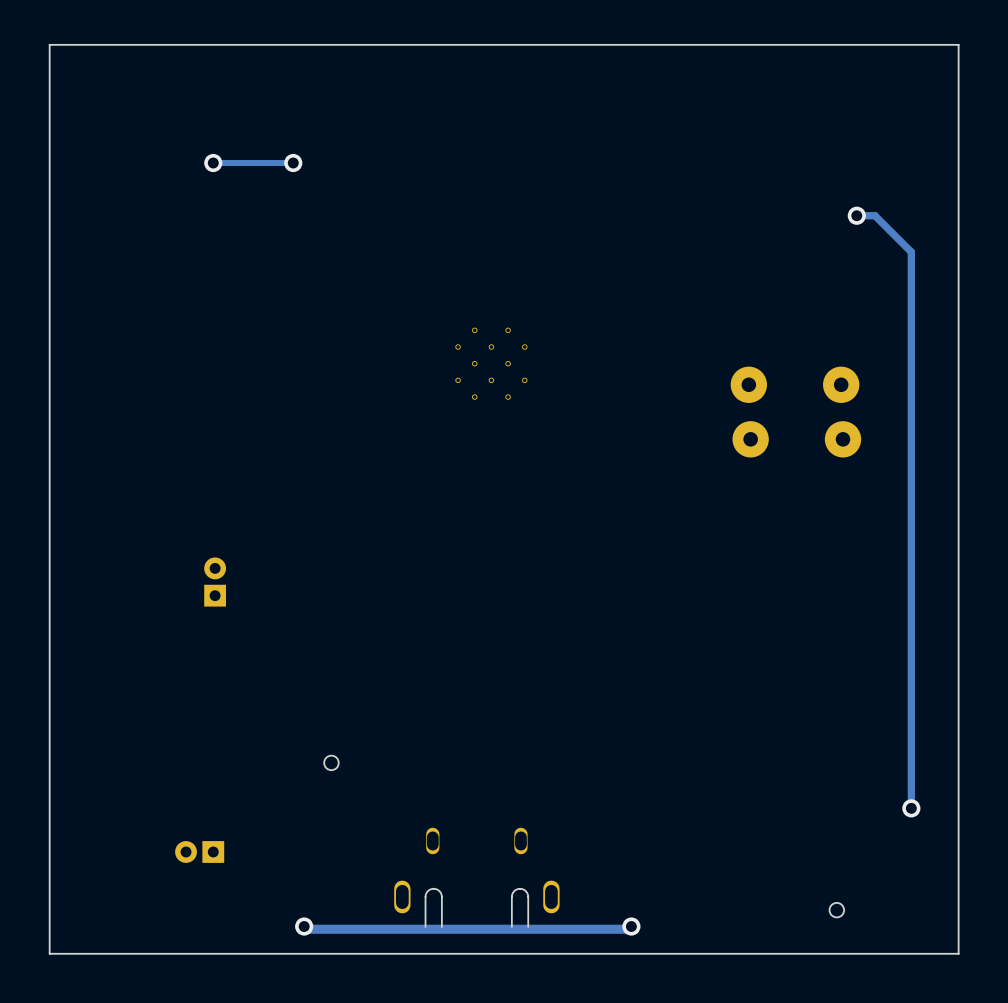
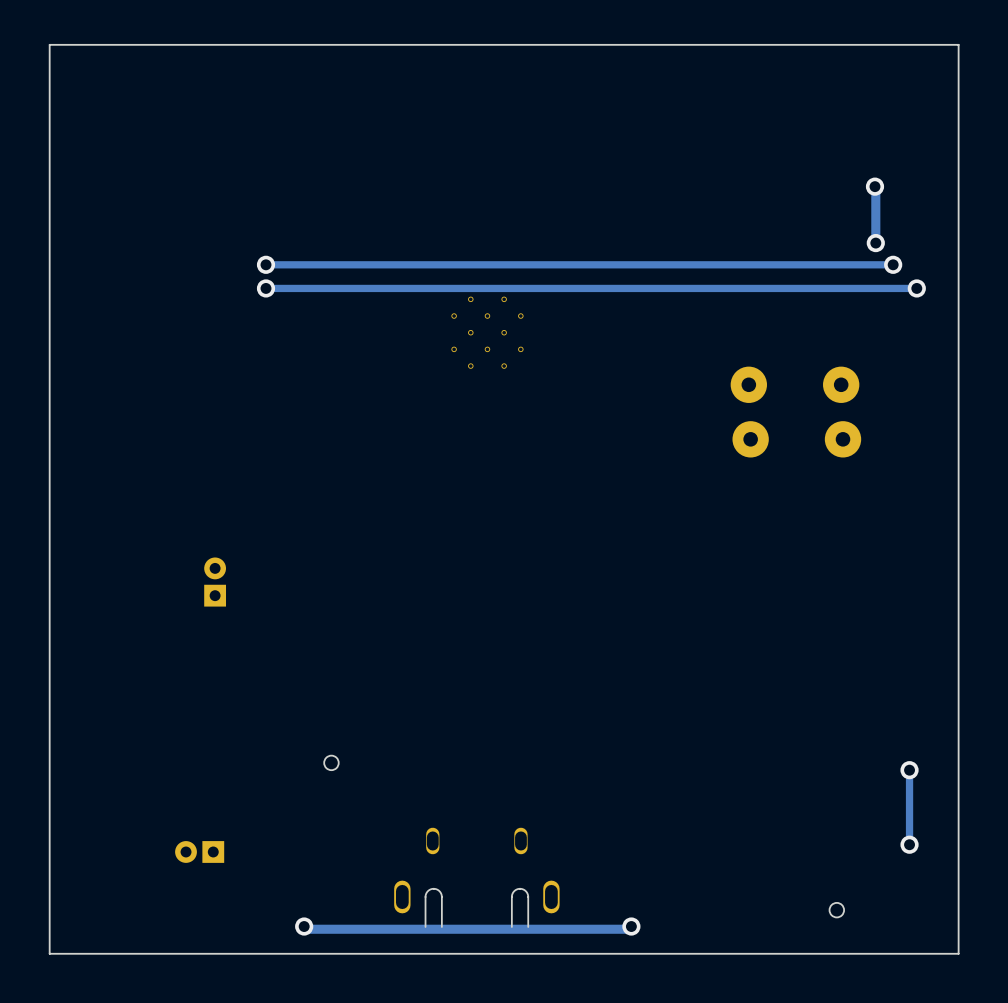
via: (213, 163) -> none
track: (293, 163) (213, 163) -> none
via: (293, 163) -> none
track: none -> (874, 186) (875, 243)
via: none -> (874, 186)
track: (856, 215) (874, 215) (911, 252) (911, 808) -> none
via: (856, 215) -> none
via: none -> (875, 243)
via: none -> (266, 264)
track: none -> (893, 264) (266, 264)
via: none -> (893, 264)
via: none -> (266, 288)
track: none -> (916, 288) (266, 288)
via: none -> (916, 288)
part position: (491, 363) -> (487, 332)
track: none -> (909, 770) (909, 844)
via: none -> (909, 770)
via: (911, 808) -> none
via: none -> (909, 844)

